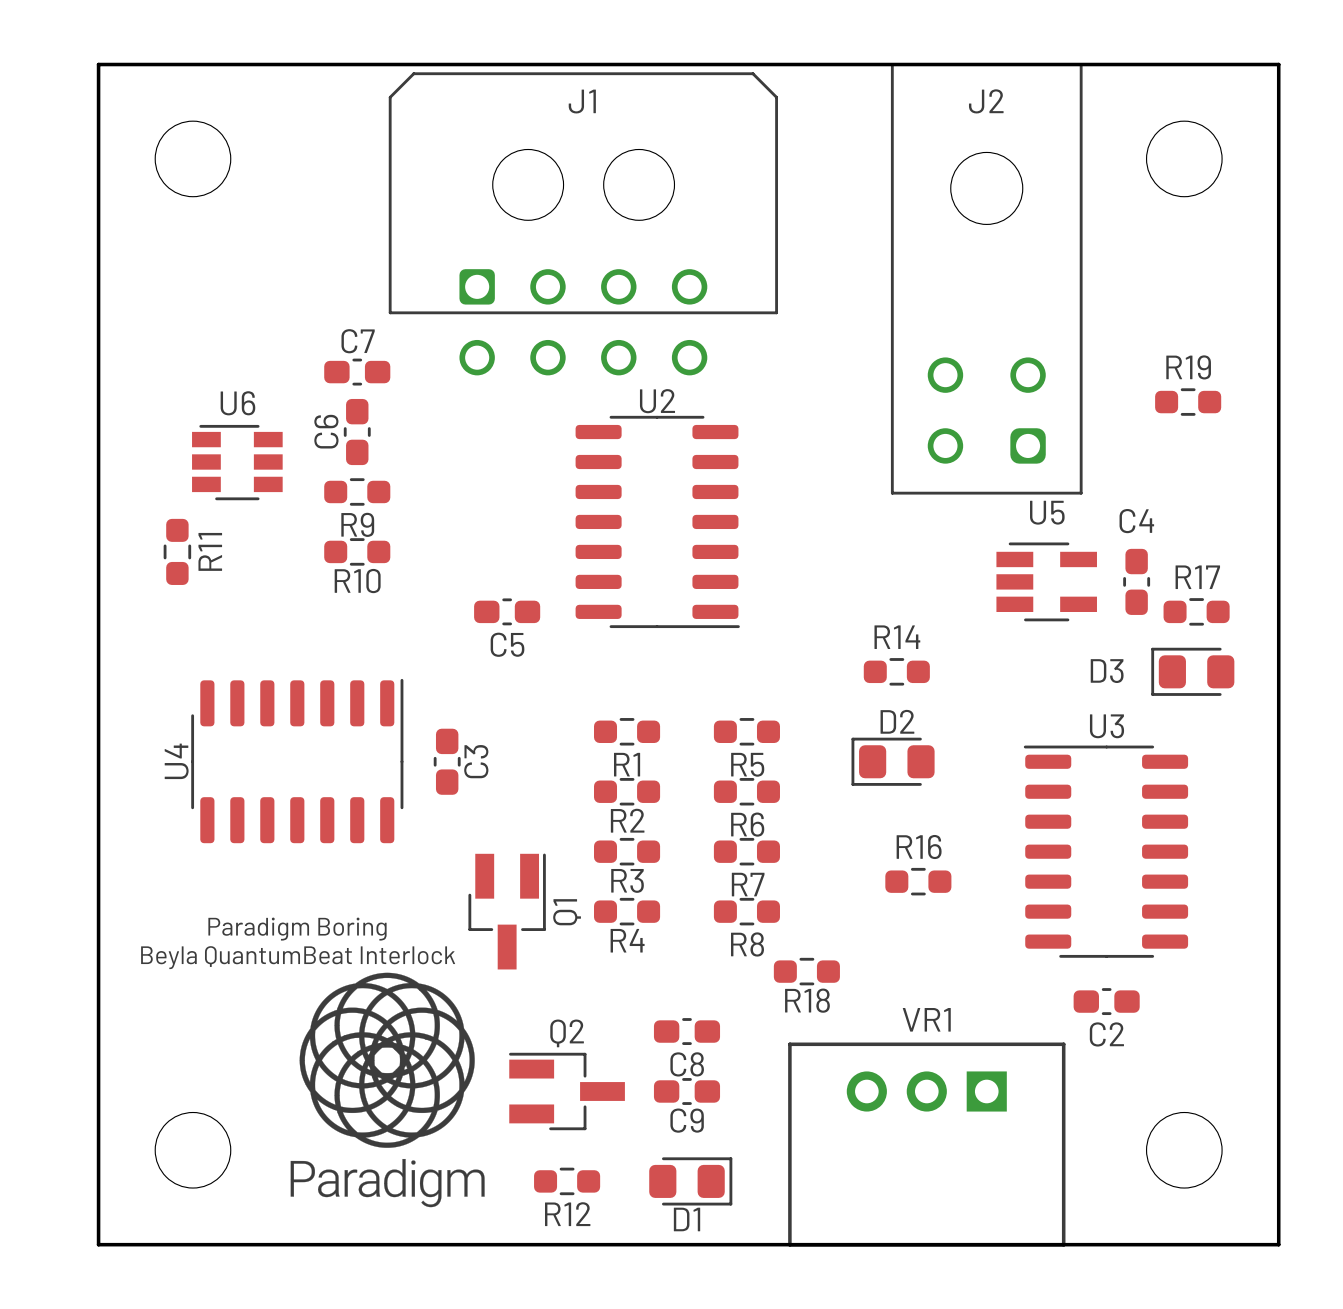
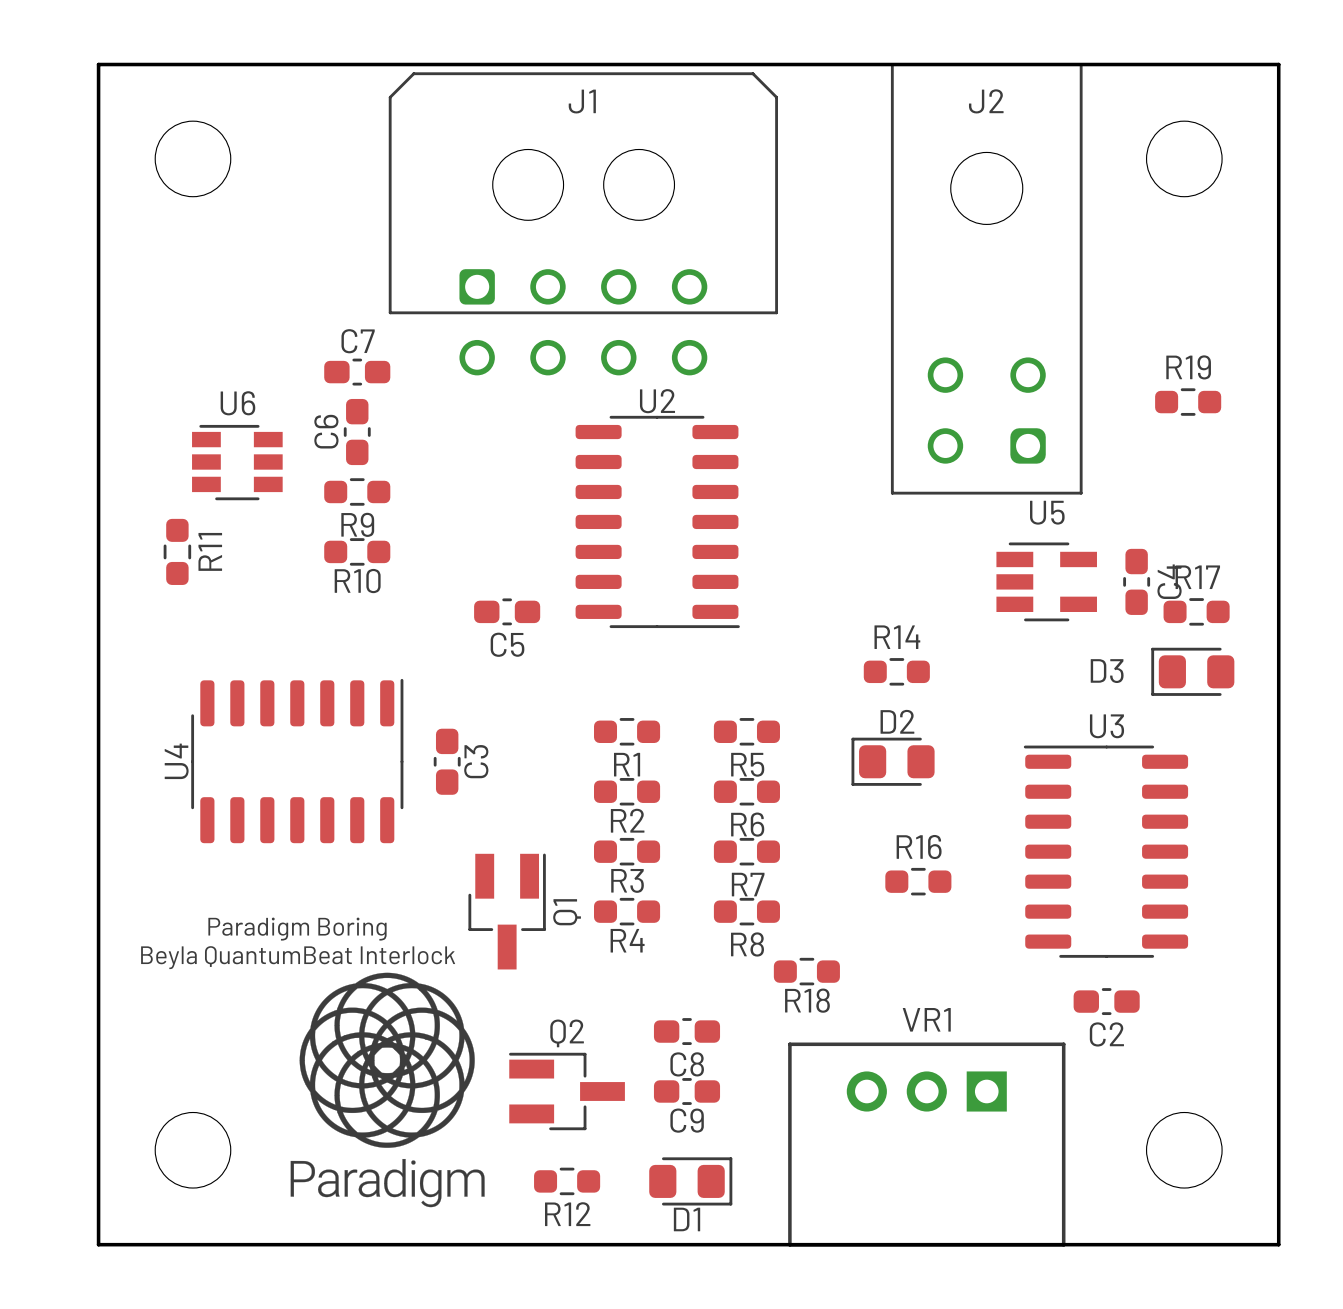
C4 name rotation: 0° (1136, 521) -> 90° counterclockwise (1169, 581)
C4 name position: C4 (1136, 521) -> C4 (1169, 581)

